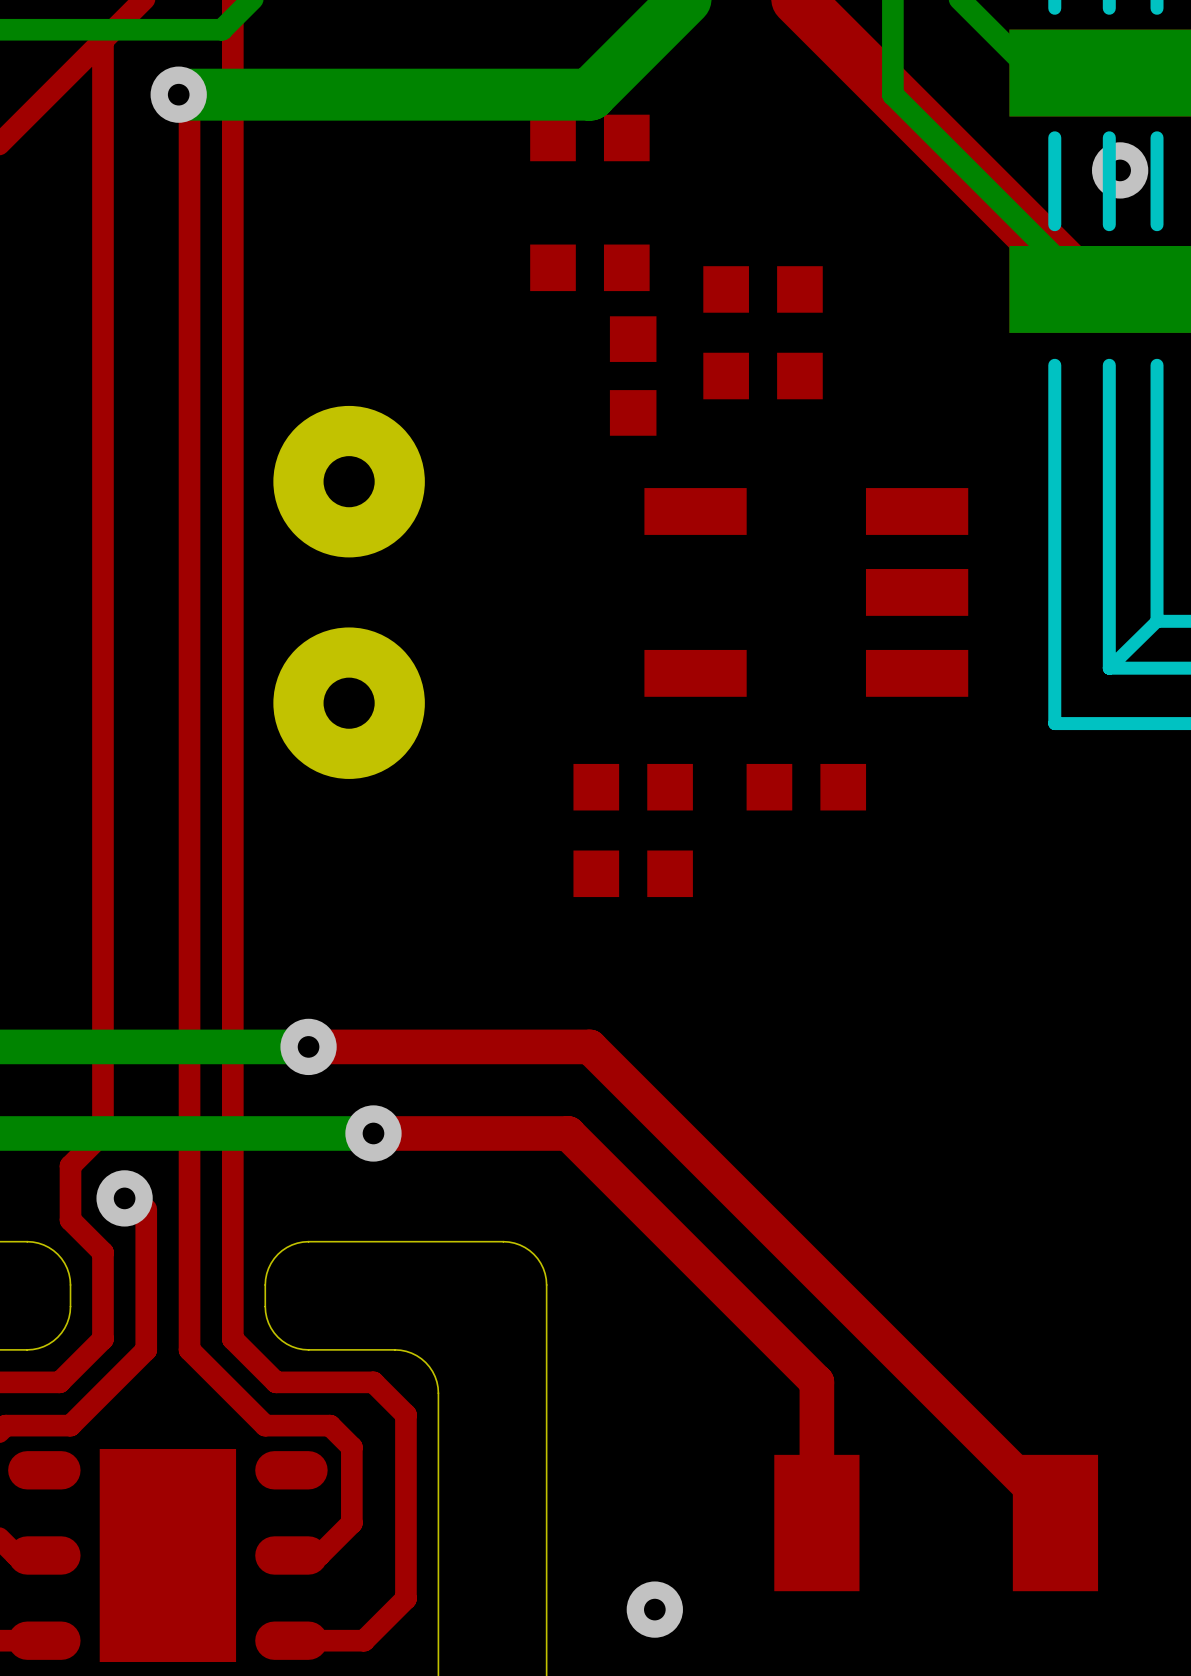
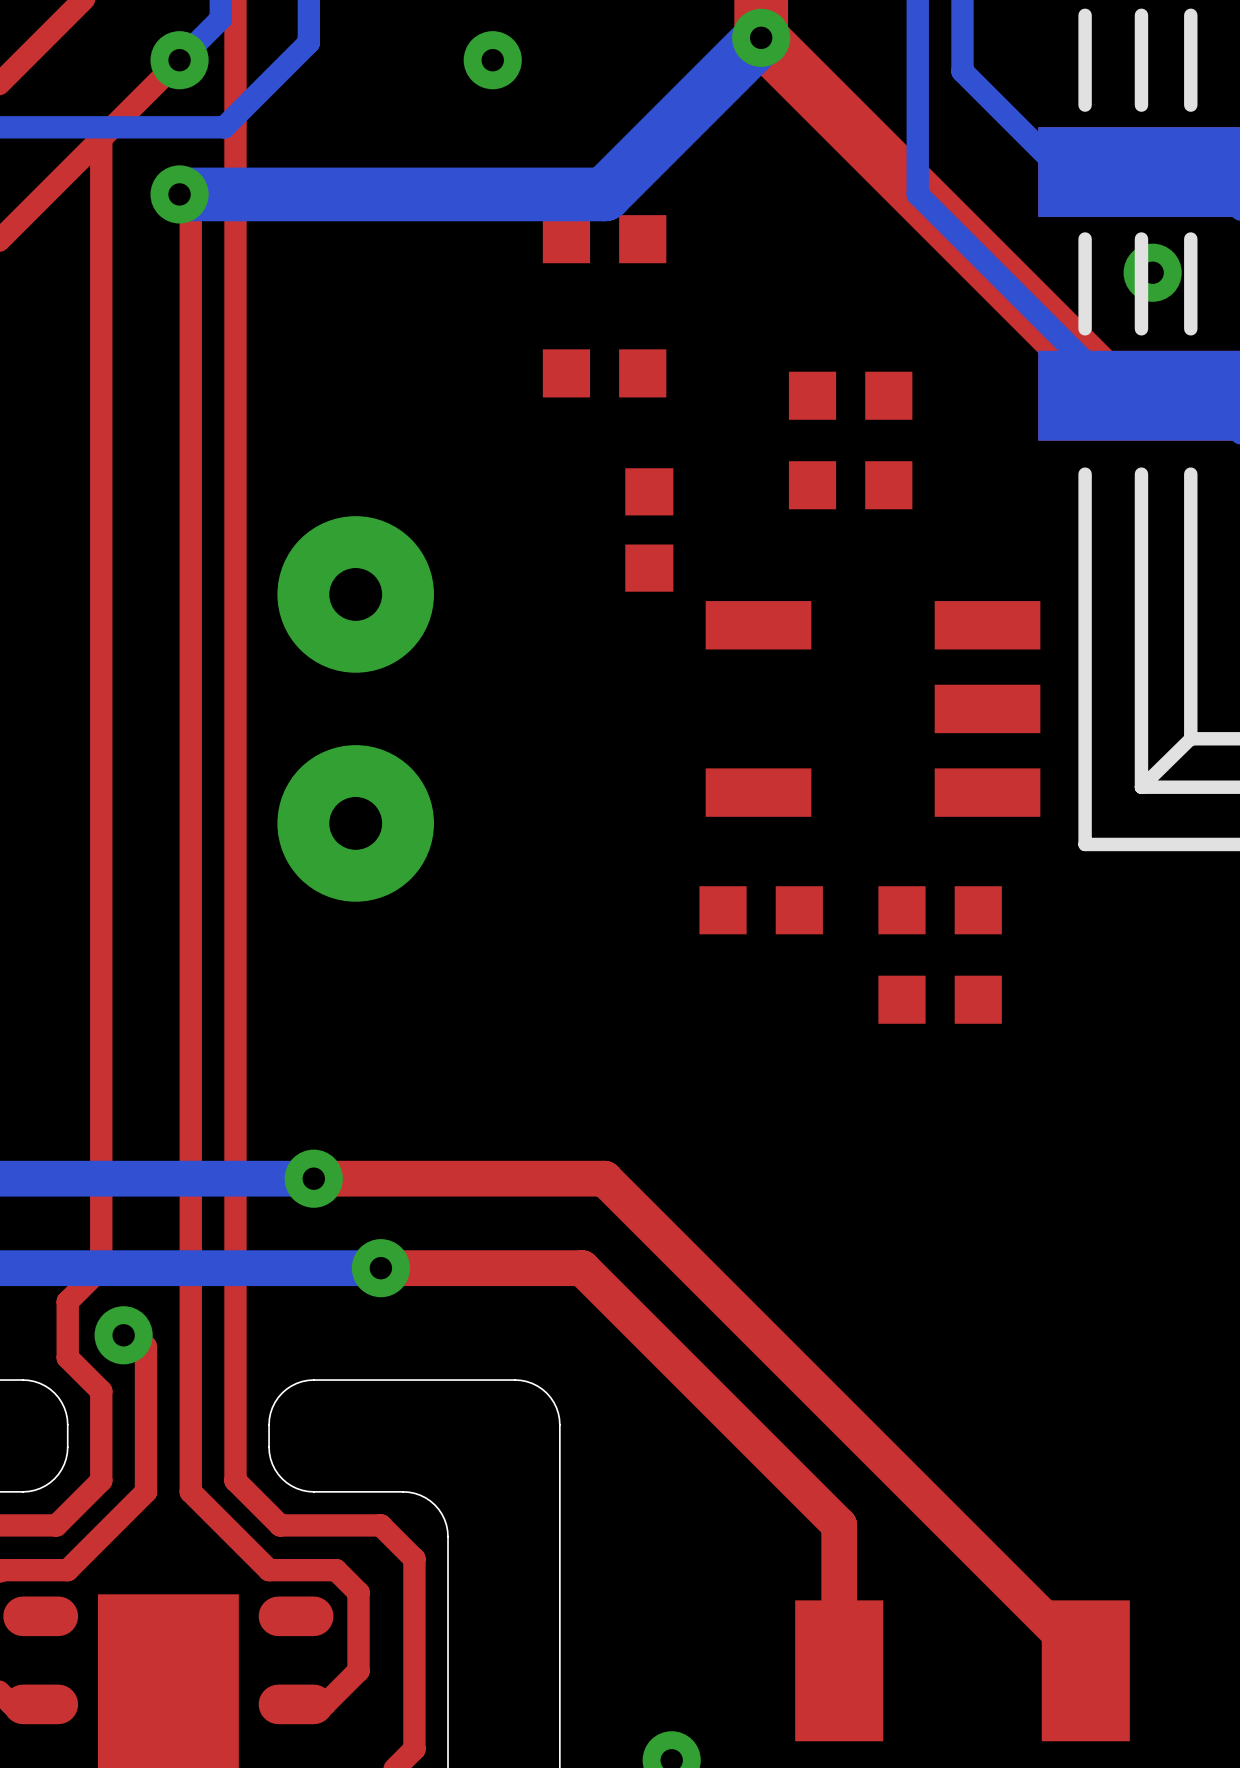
part: (763, 289) -> none
part: none -> (850, 395)
part position: (633, 376) -> (649, 529)
part: (763, 376) -> none
part: none -> (850, 485)
part position: (806, 592) -> (873, 708)
part: (633, 787) -> none
part: none -> (761, 910)
part: (806, 787) -> none
part: none -> (940, 910)
part: (633, 873) -> none
part: none -> (940, 999)

